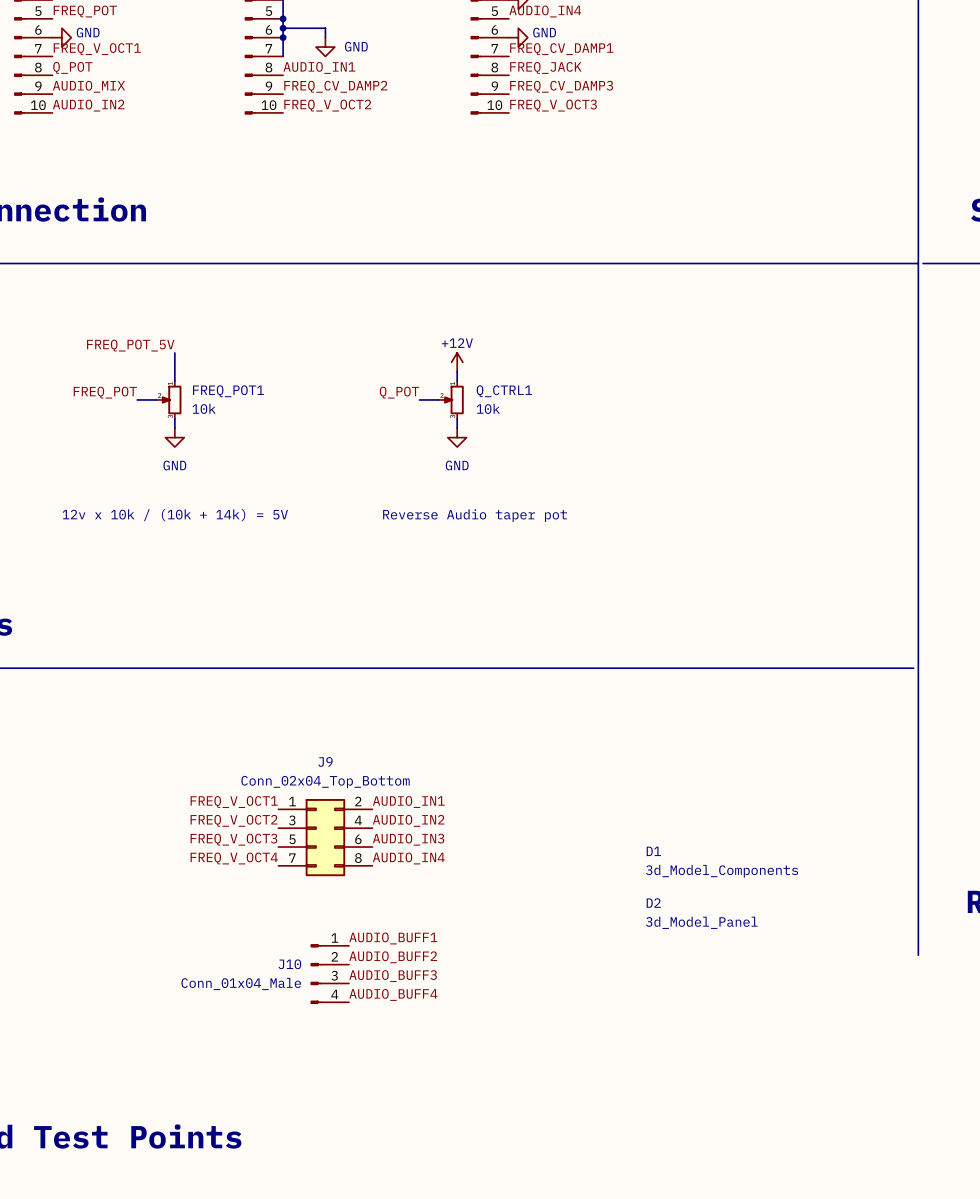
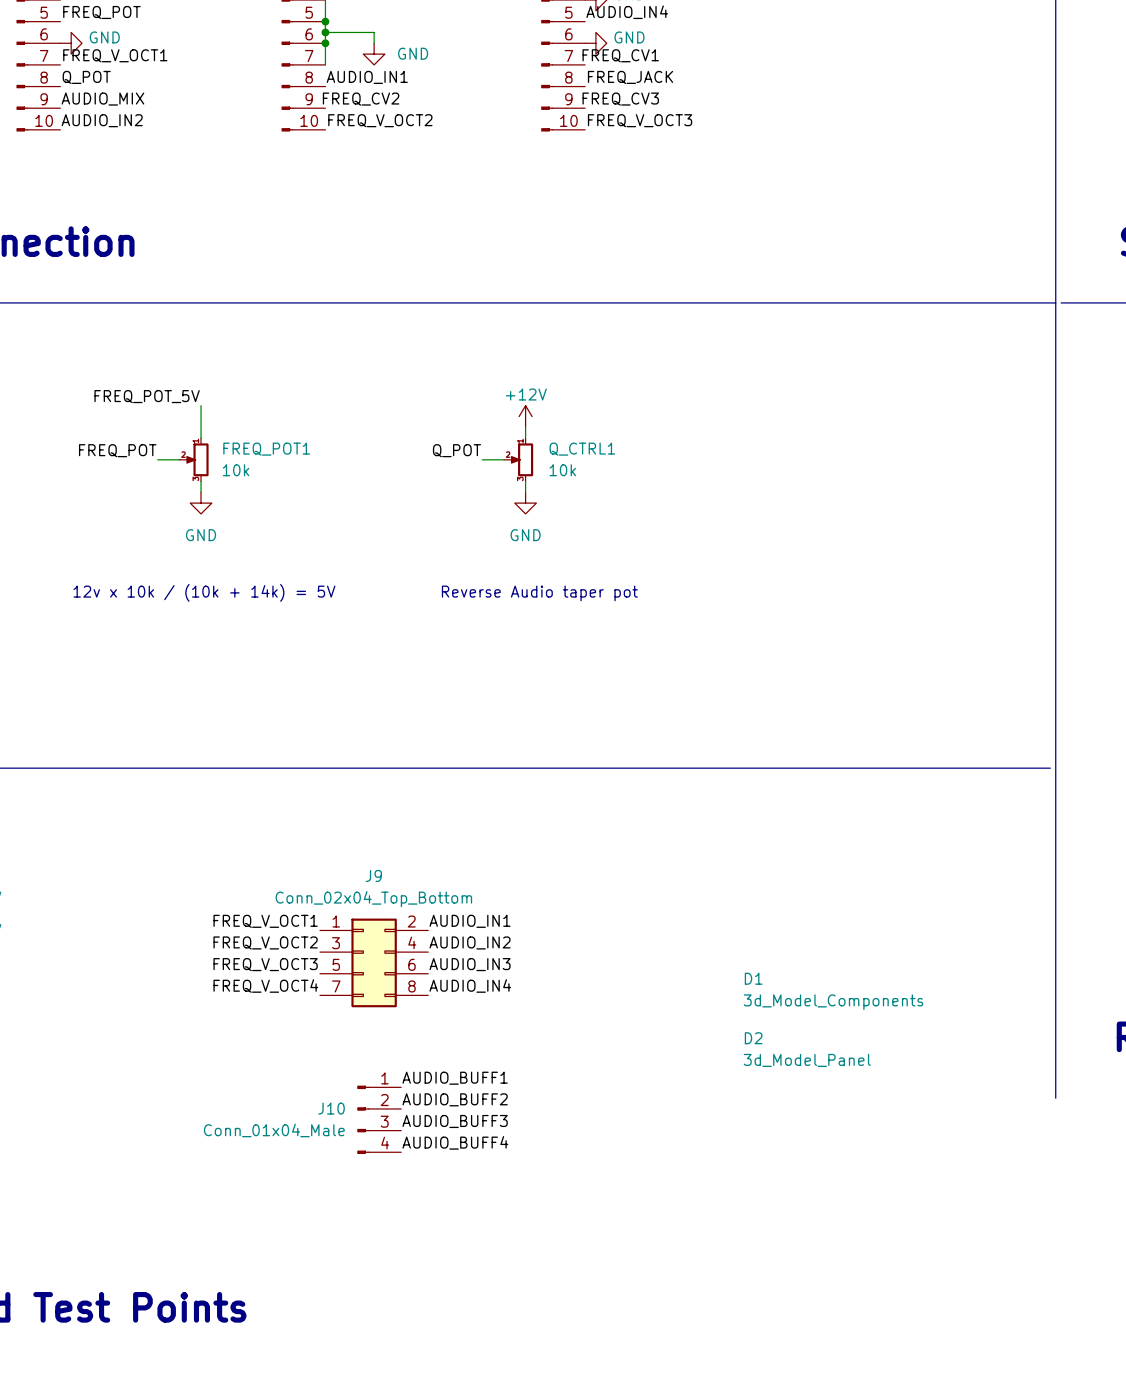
label: FREQ_CV_DAMP1 (561, 49) -> FREQ_CV1 (620, 55)
label: FREQ_CV_DAMP2 (335, 86) -> FREQ_CV2 (361, 99)
label: FREQ_CV_DAMP3 (561, 86) -> FREQ_CV3 (620, 99)

